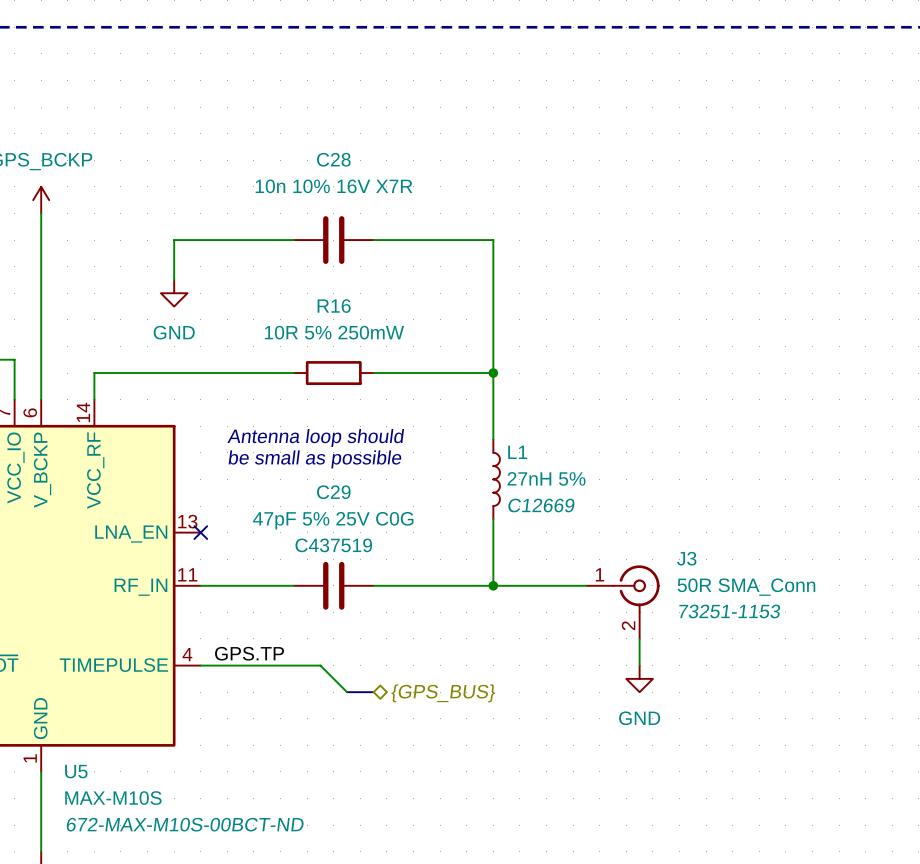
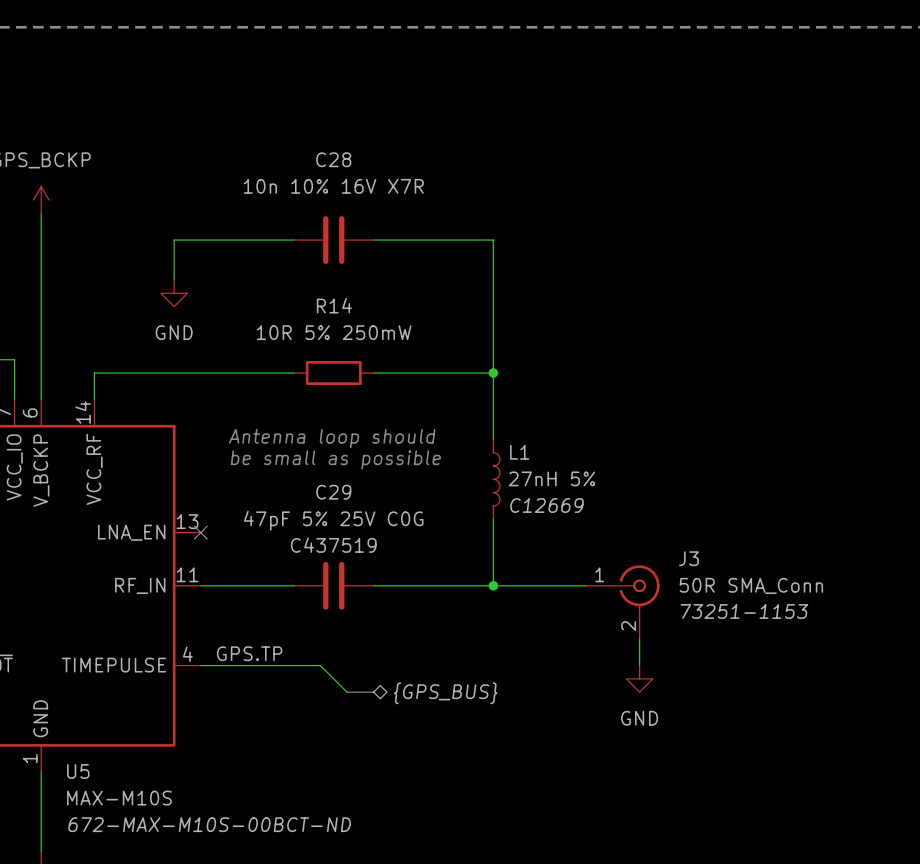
R16 name: R16 (334, 306) -> R14 (334, 305)

